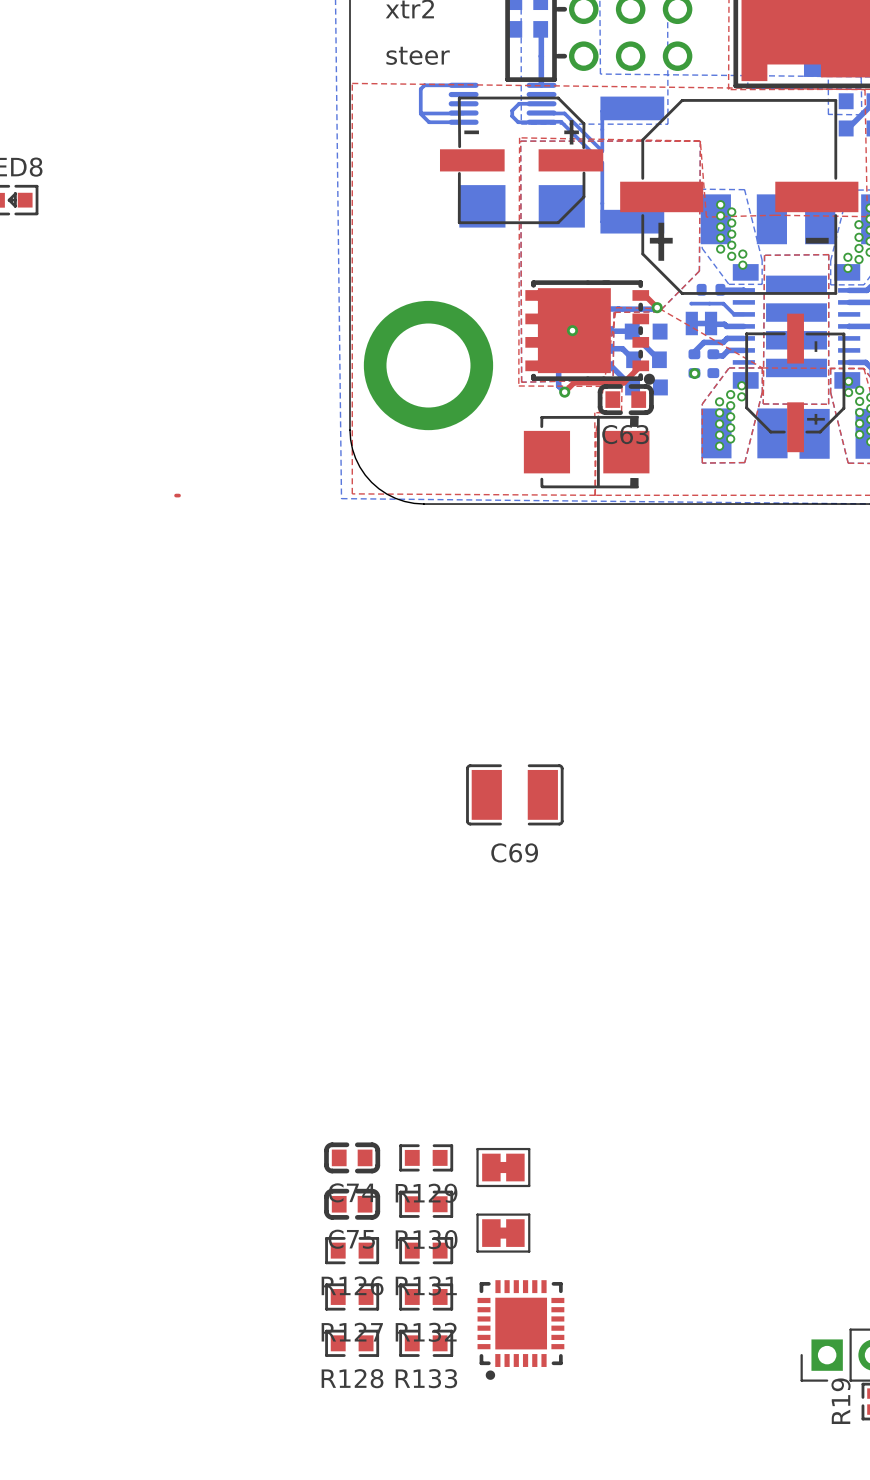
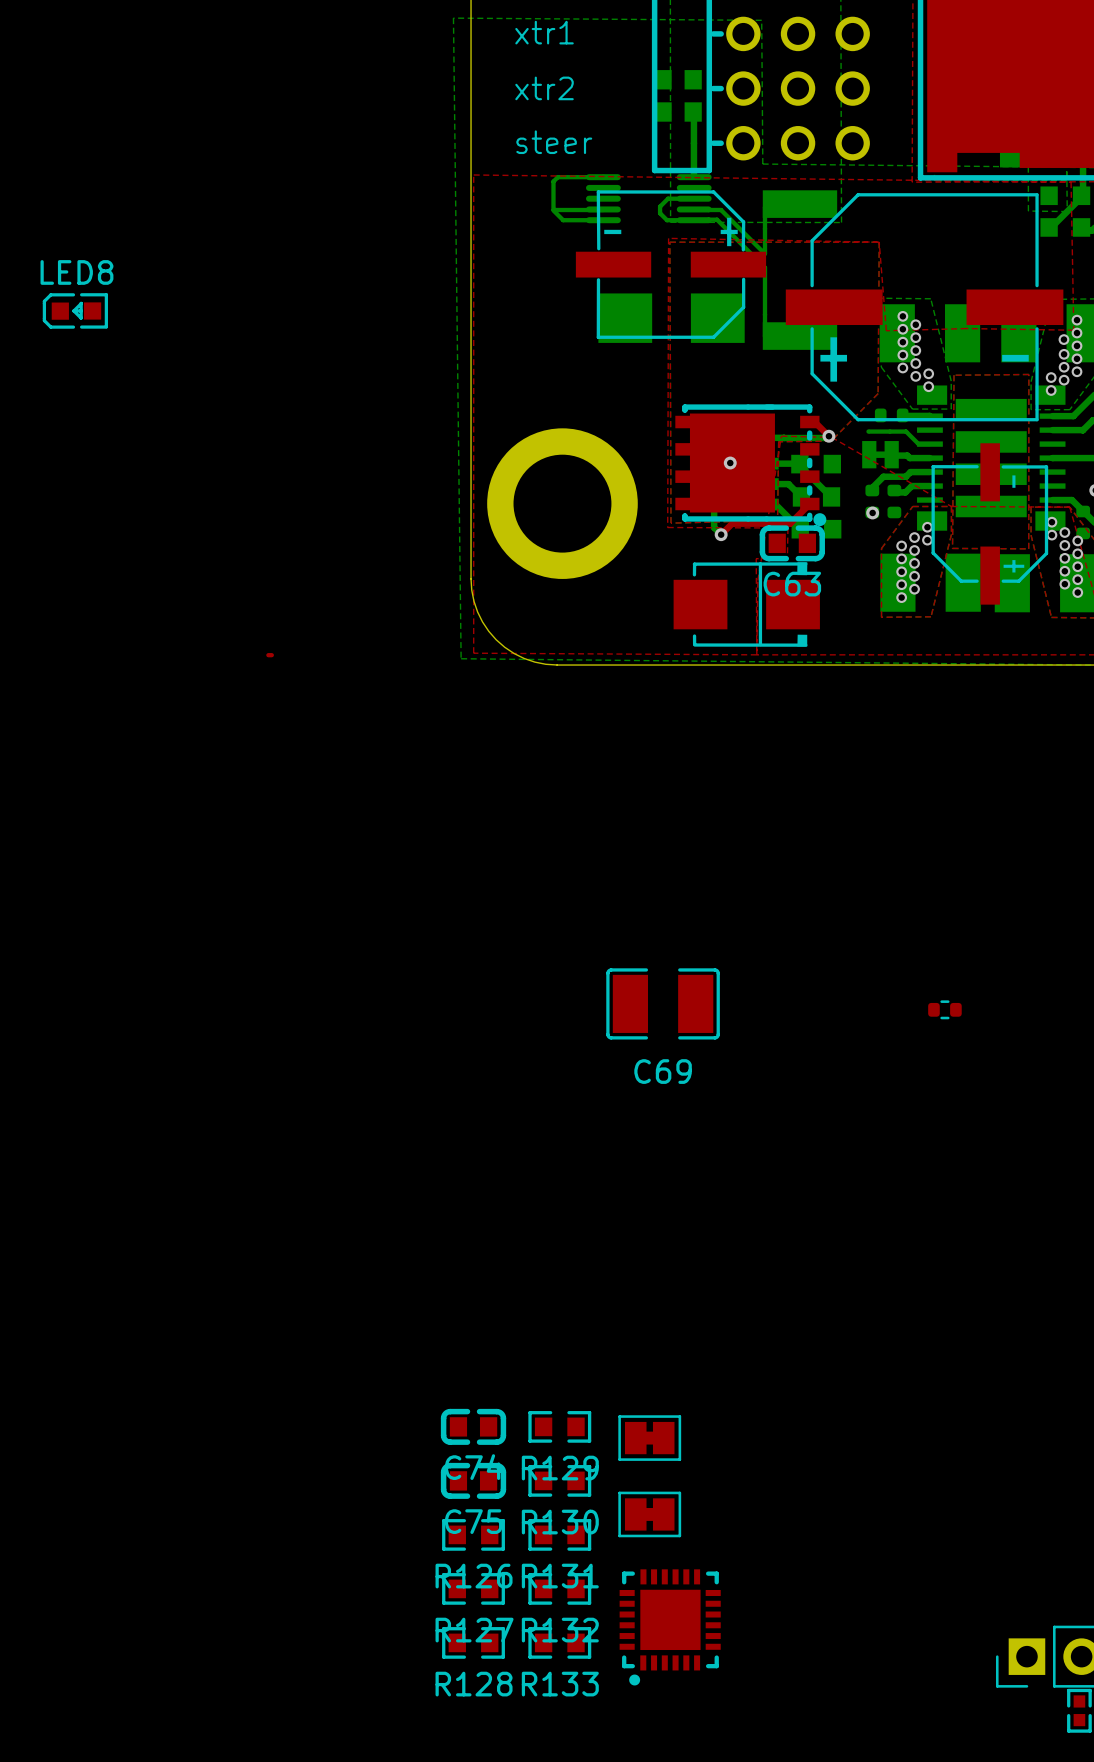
part: none -> (944, 1009)
R19 name: R19 (841, 1401) -> none

